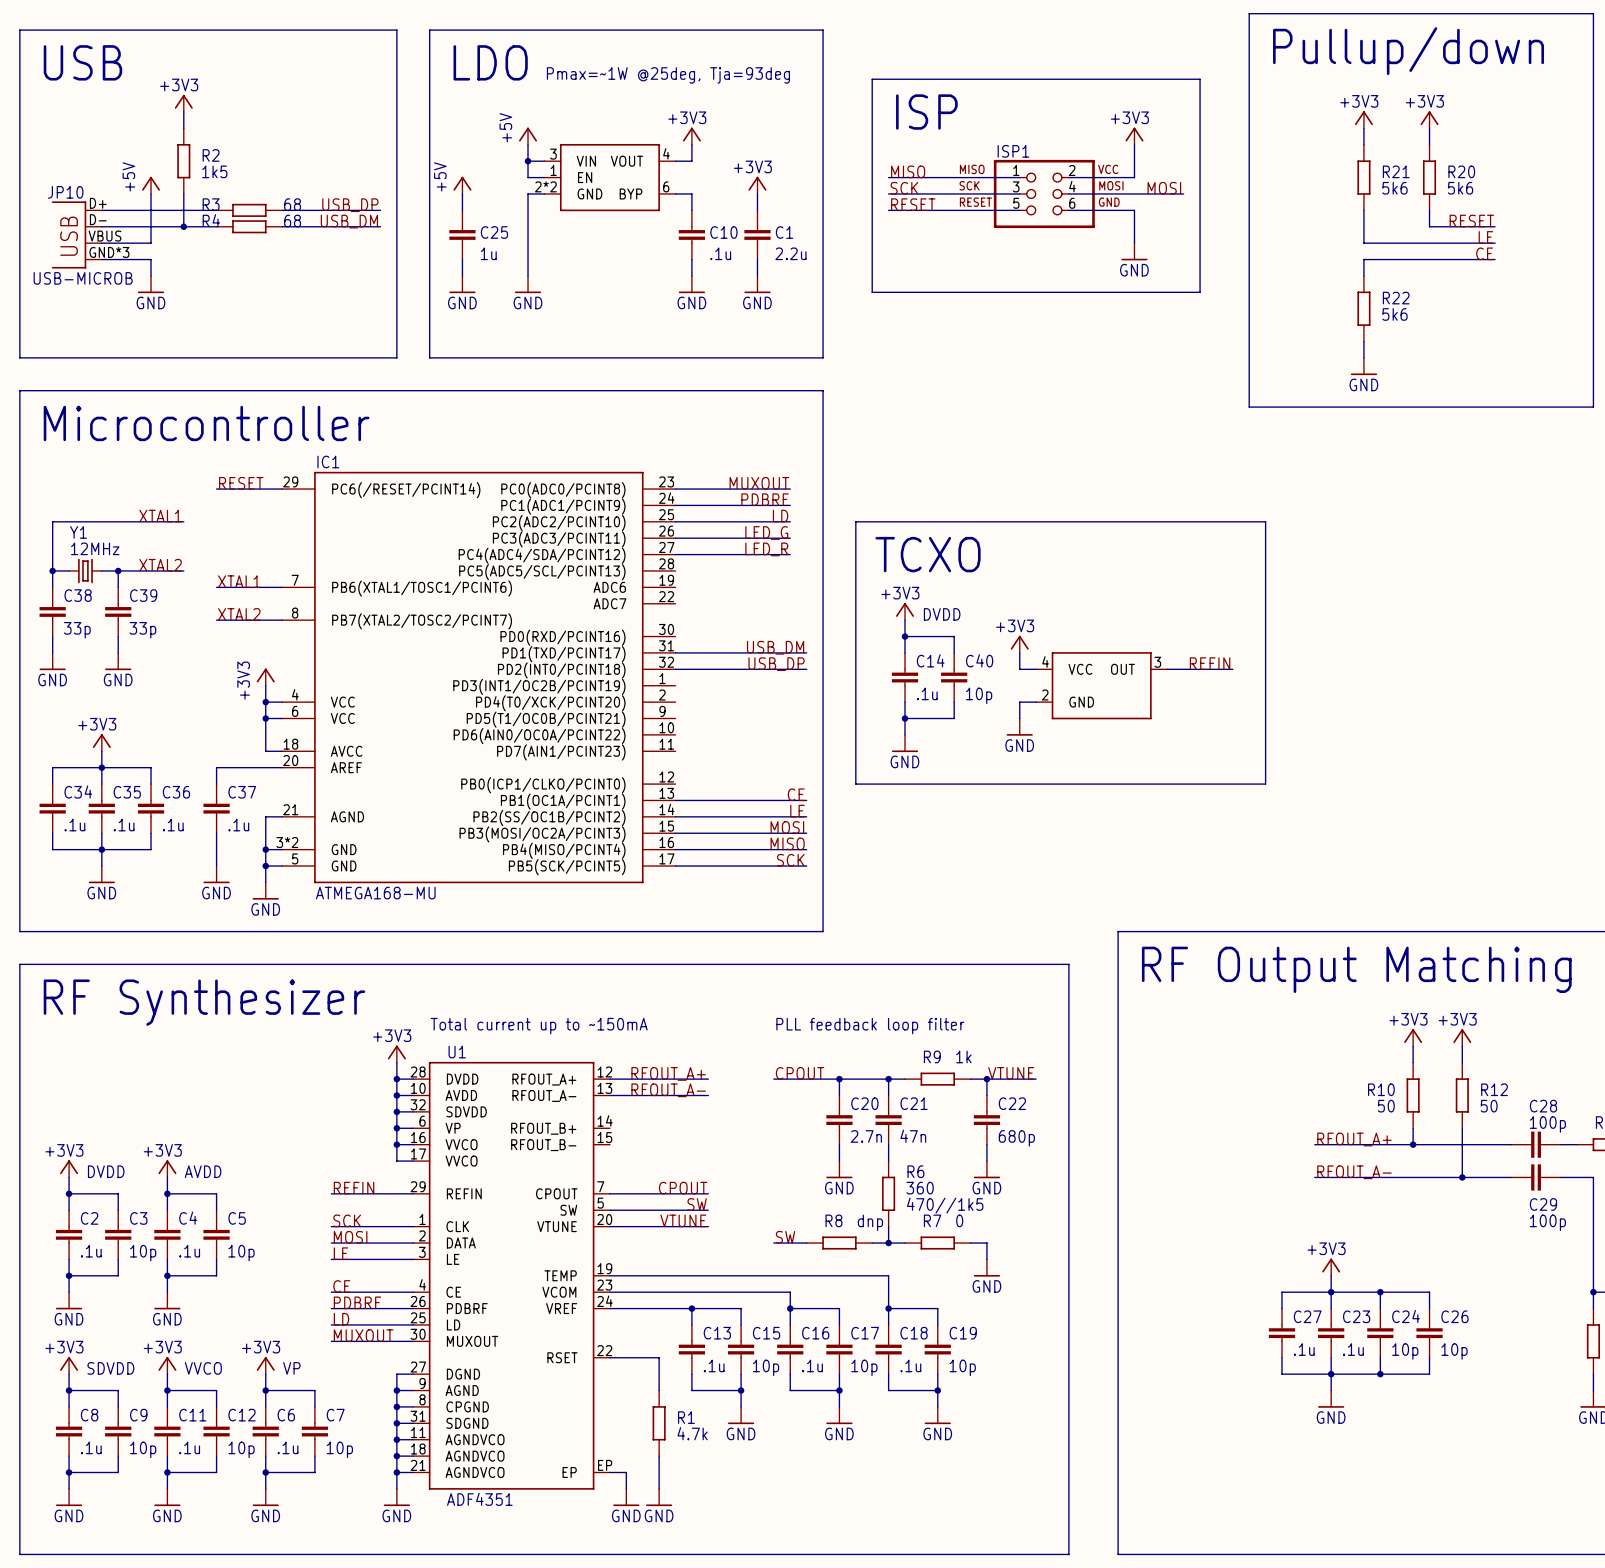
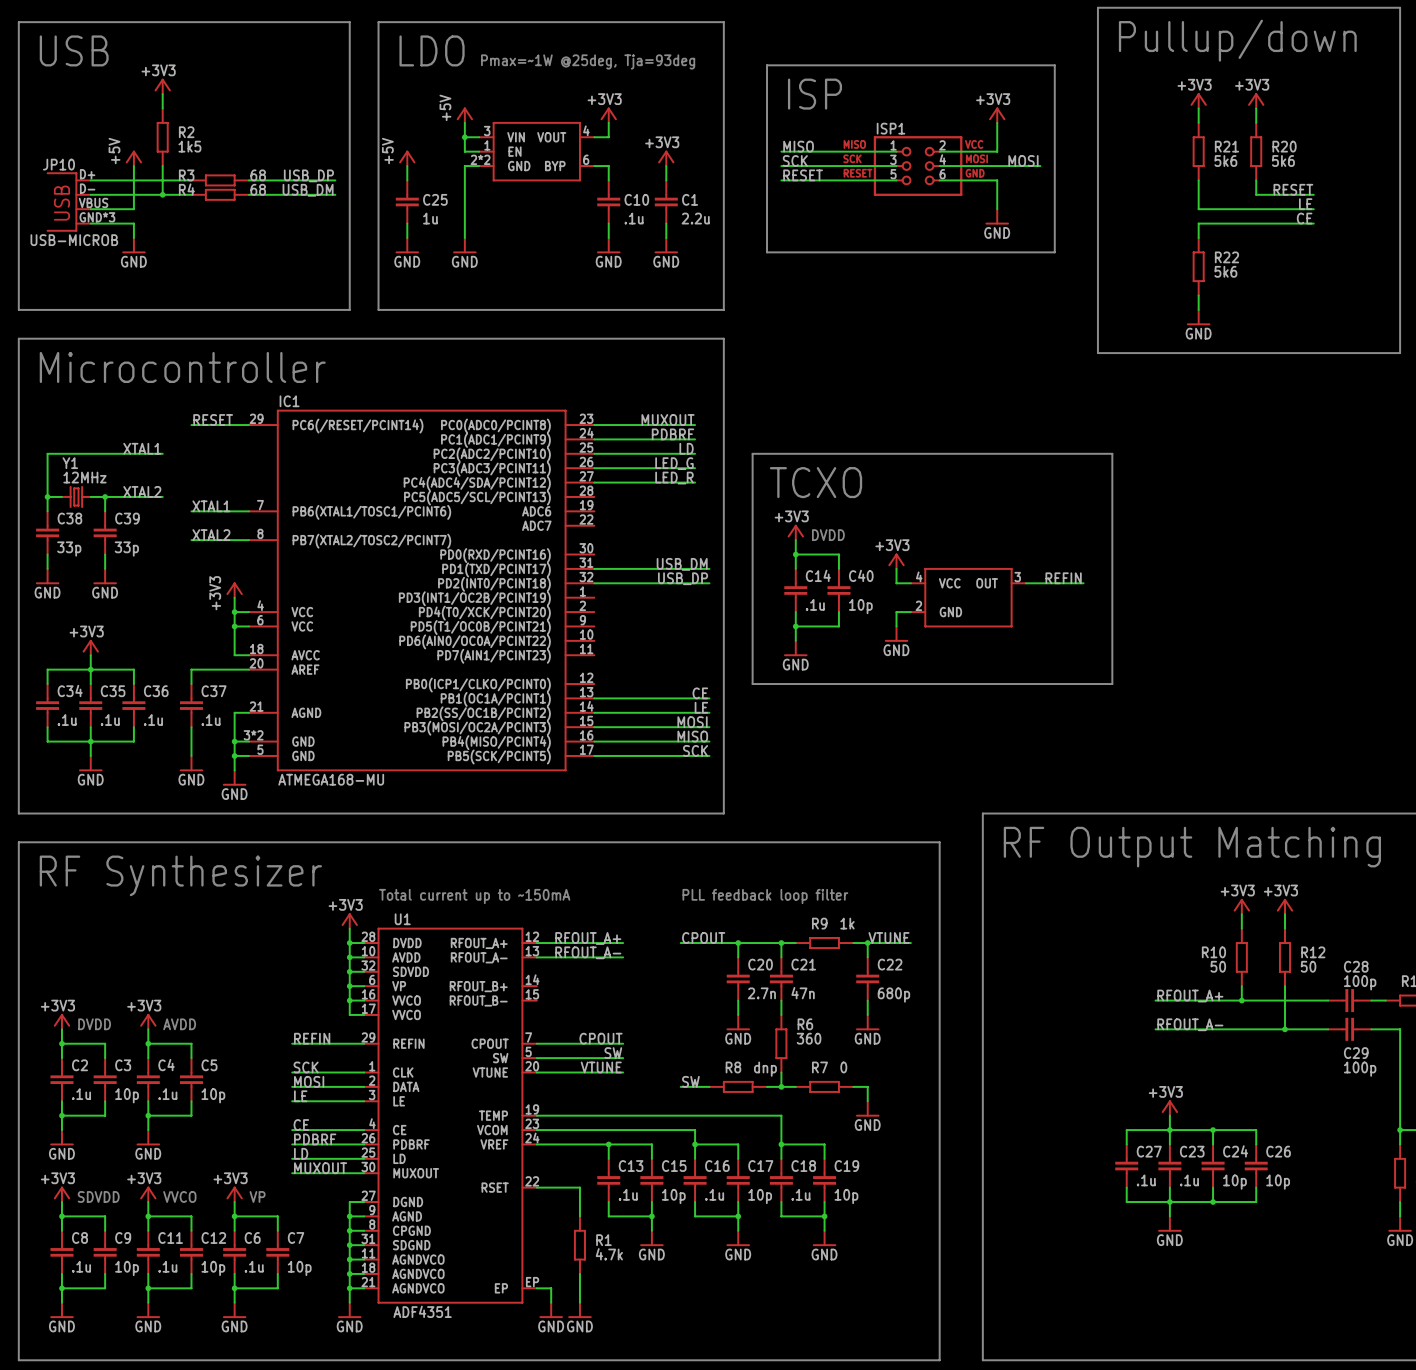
text: 470//1k5 (945, 1205) -> none

